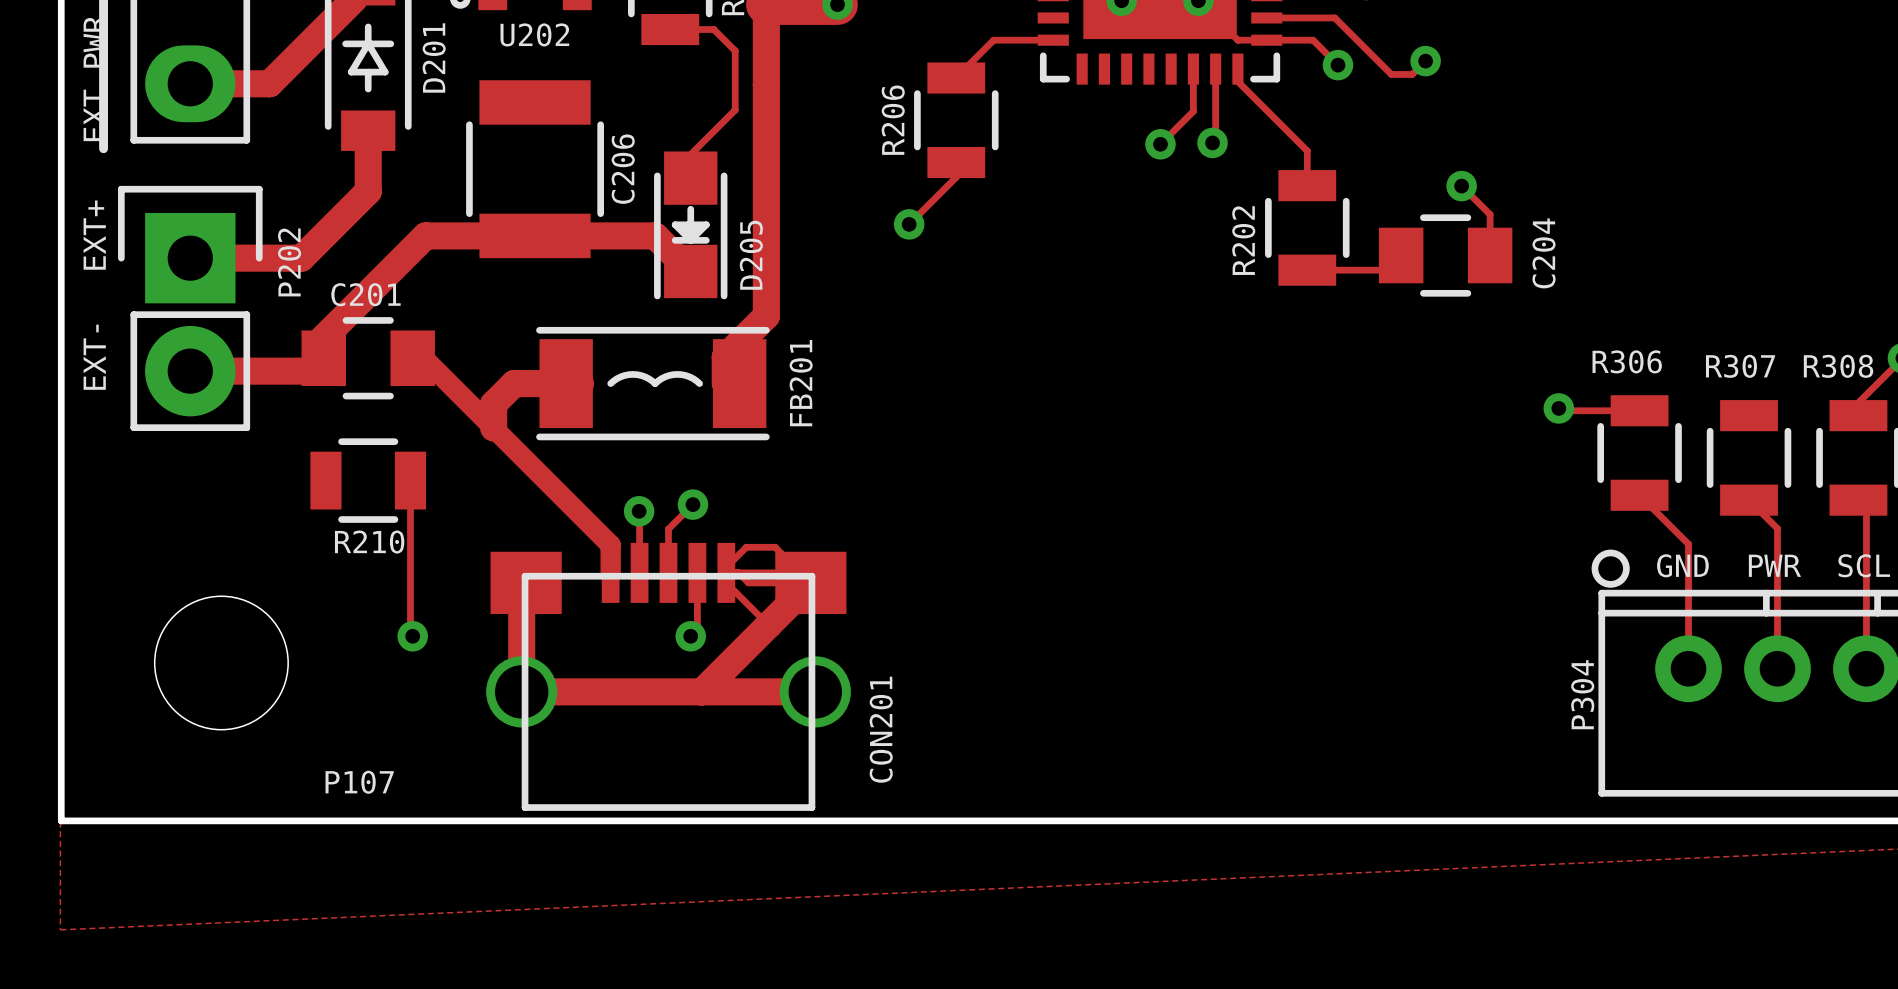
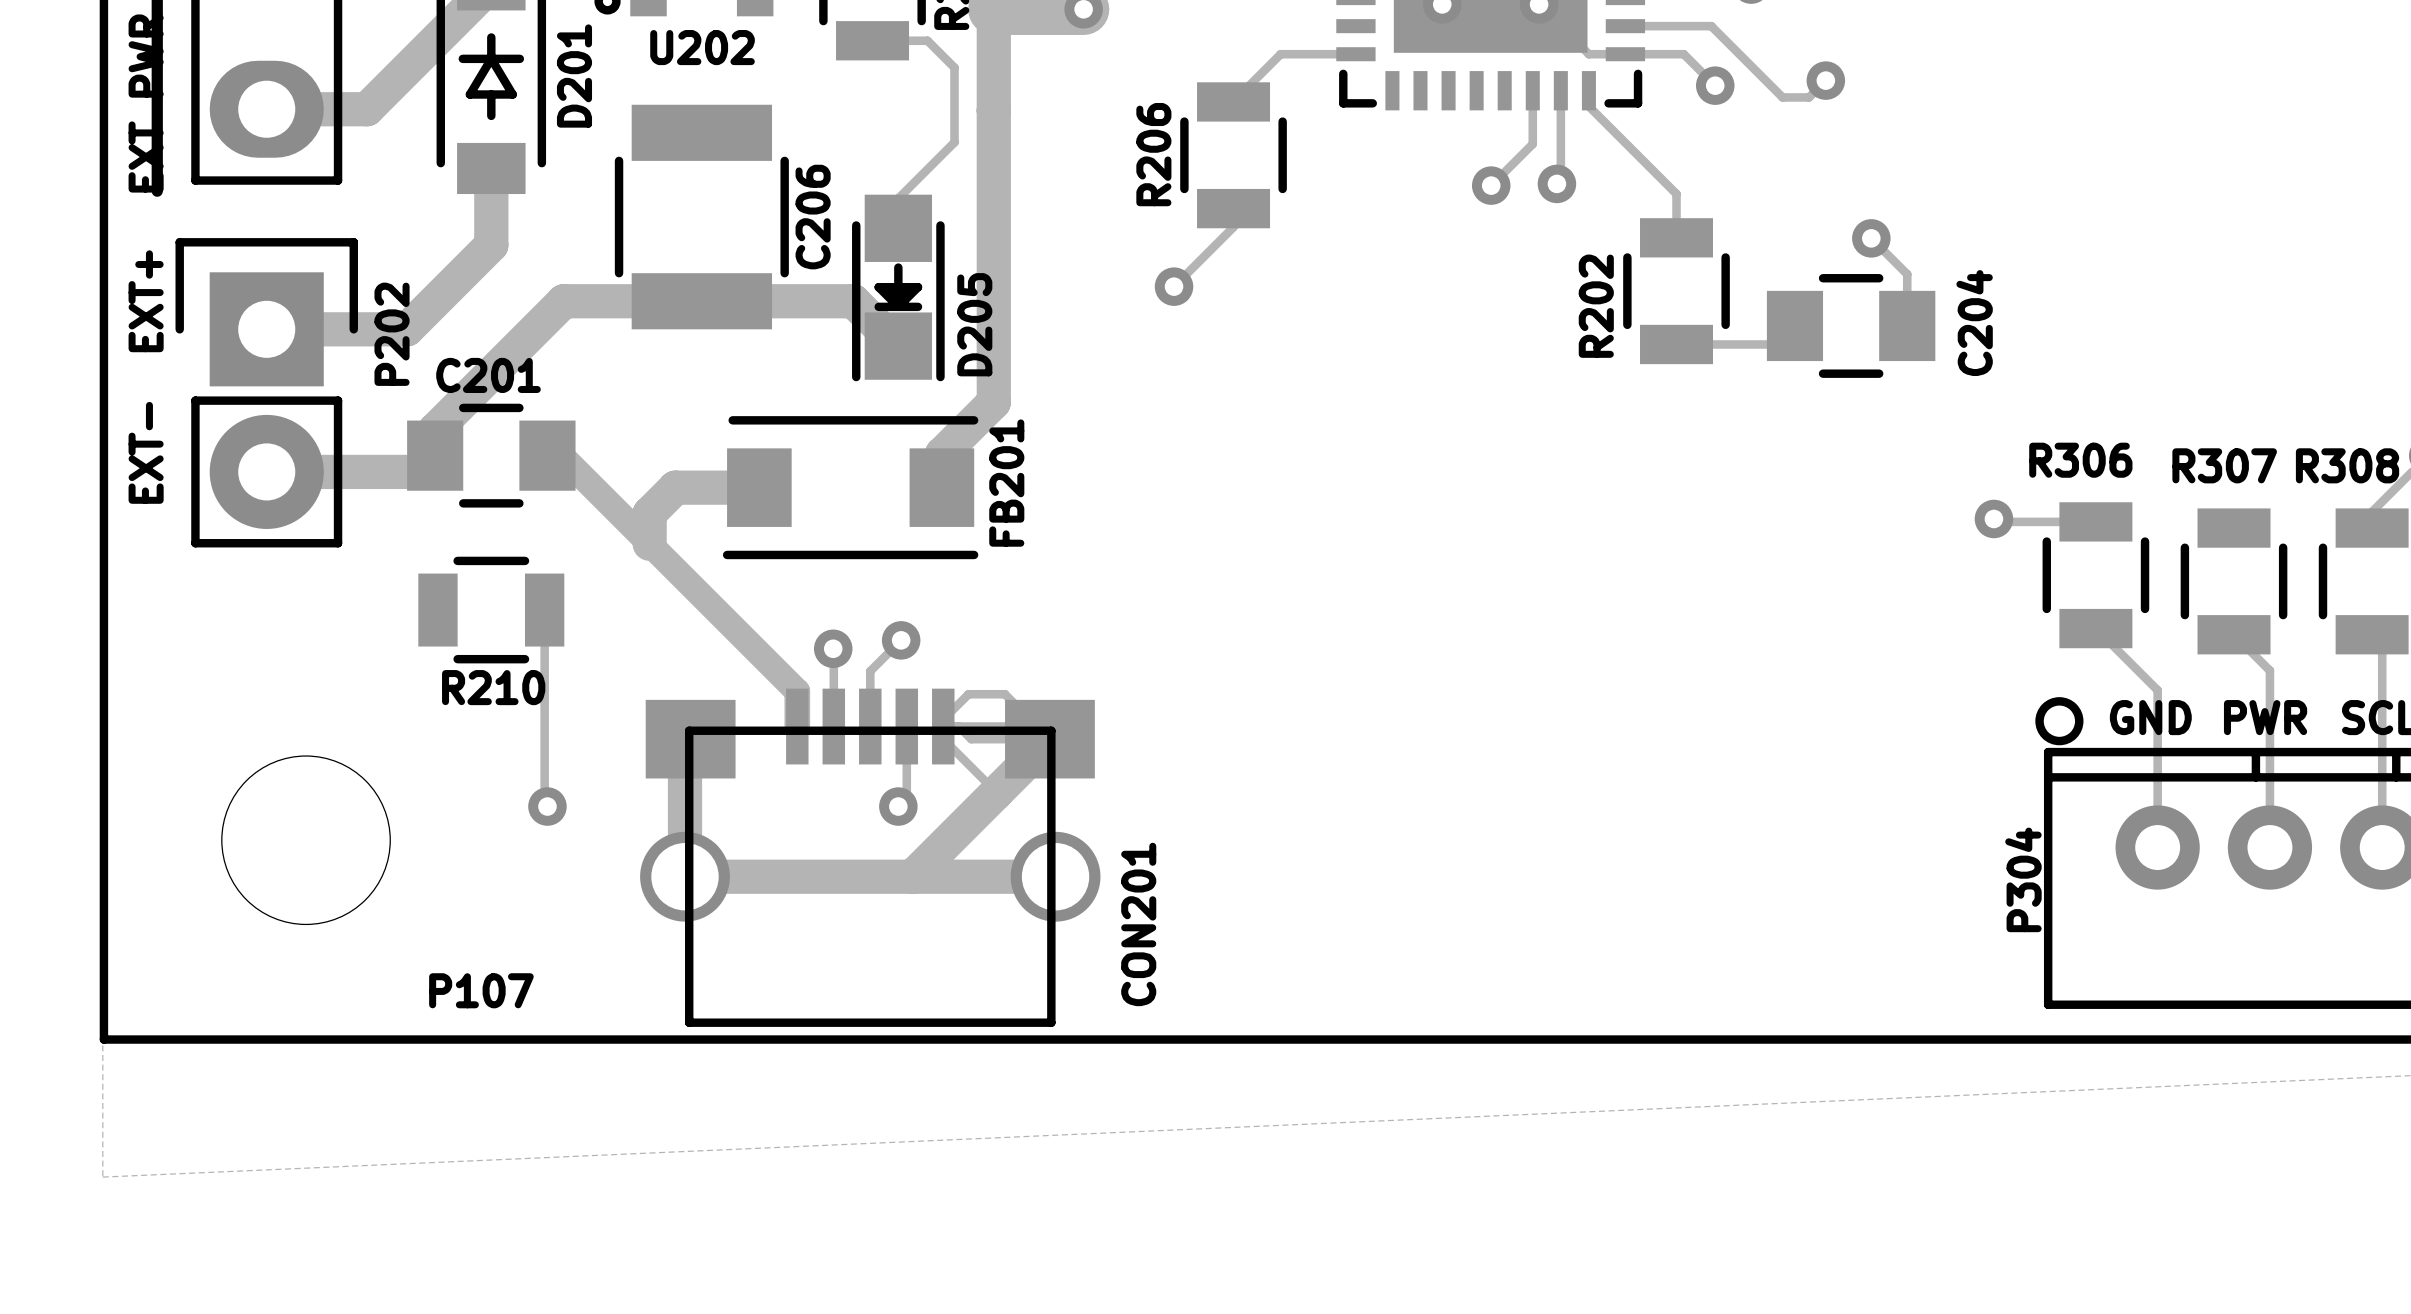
FB201 footprint: [536, 326, 770, 441] -> [722, 416, 979, 560]

